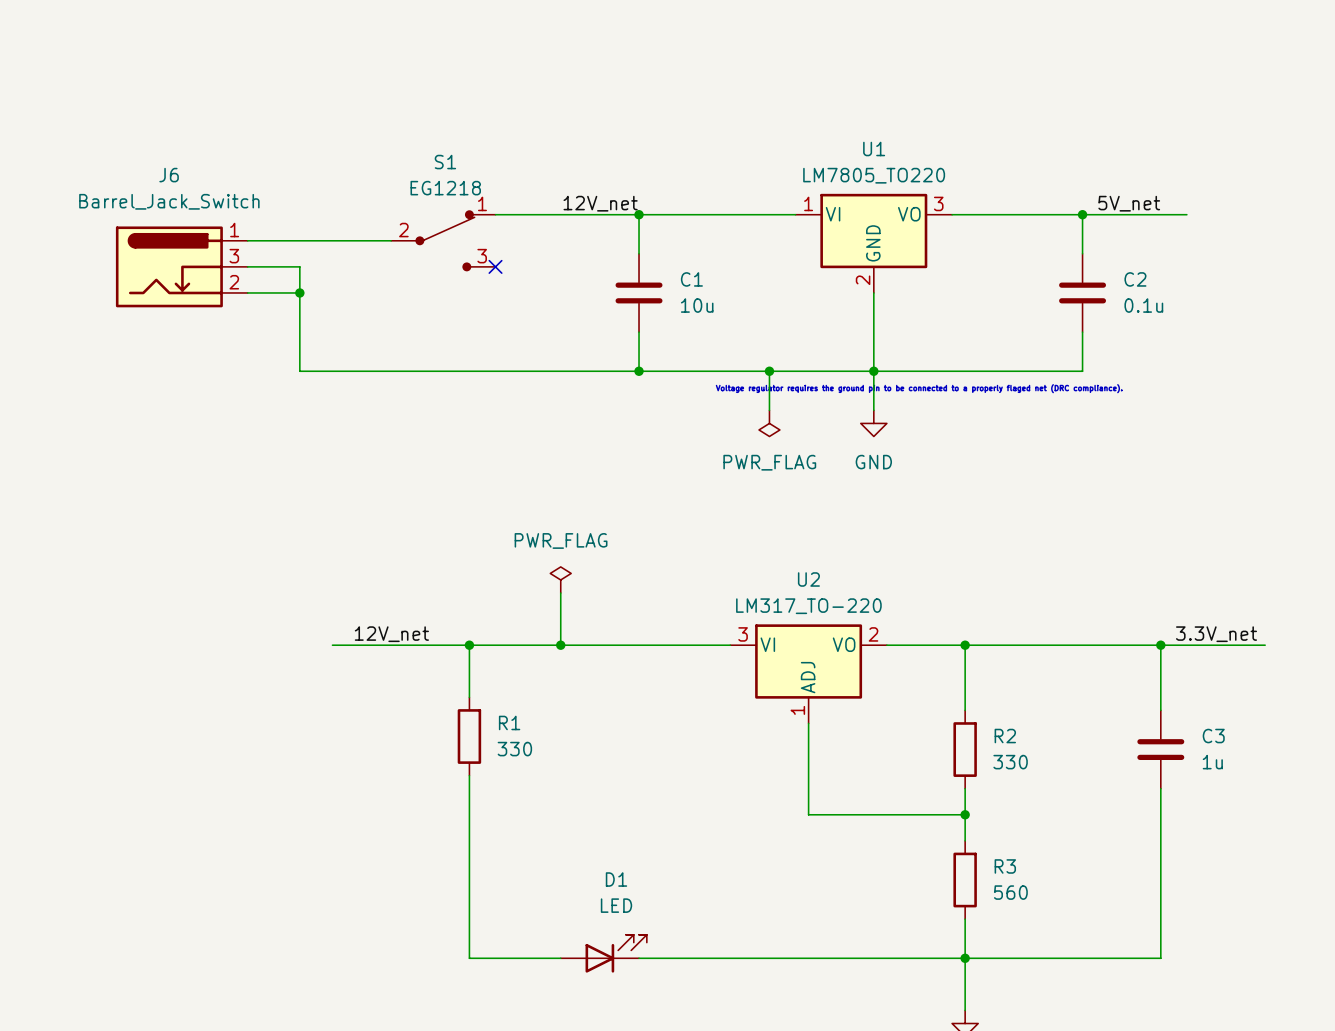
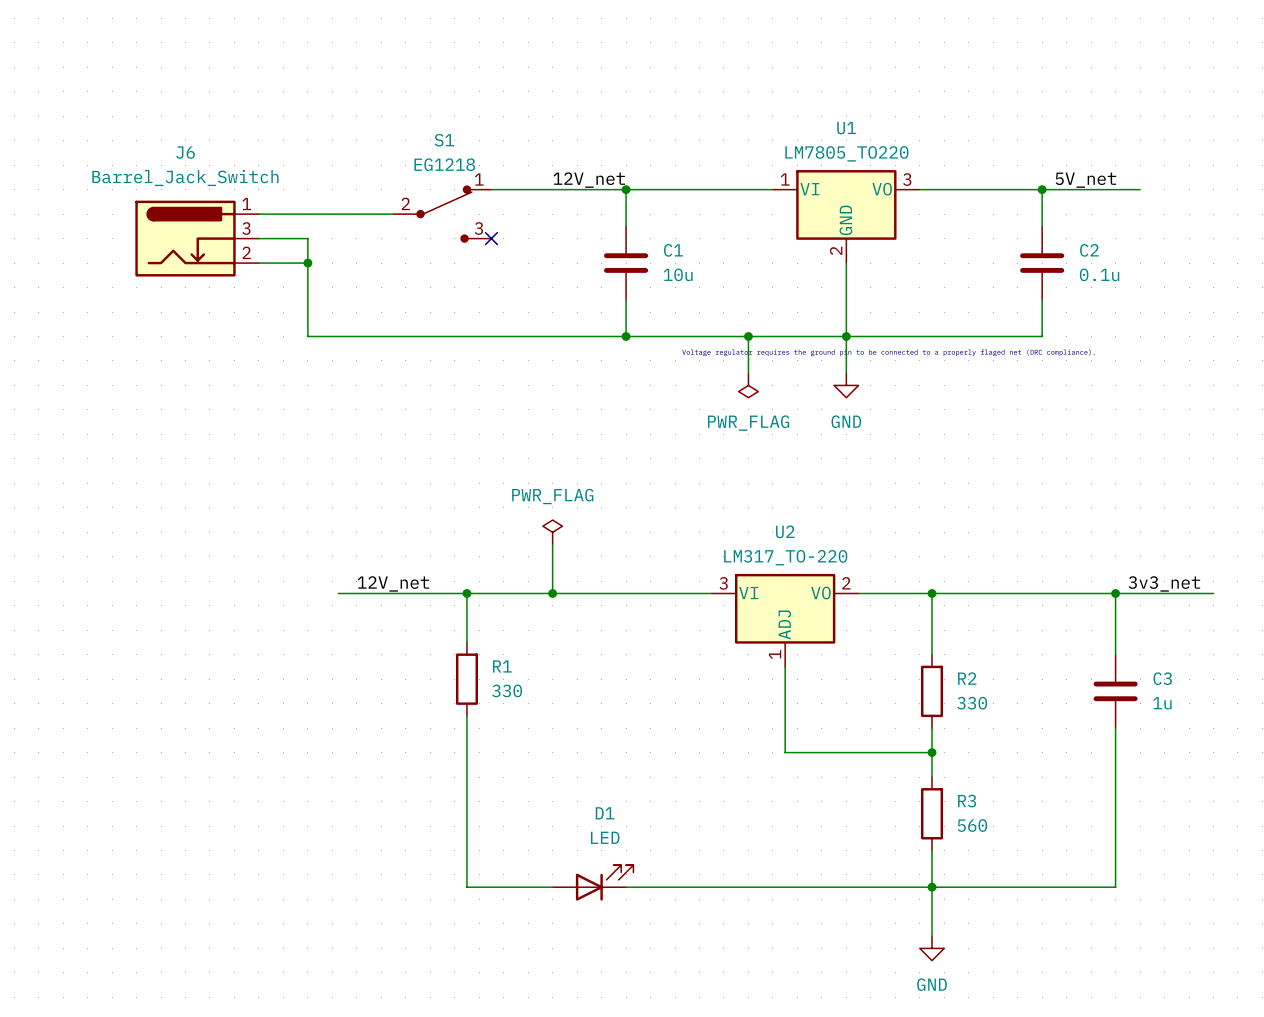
label: 3.3V_net (1216, 634) -> 3v3_net (1164, 583)

